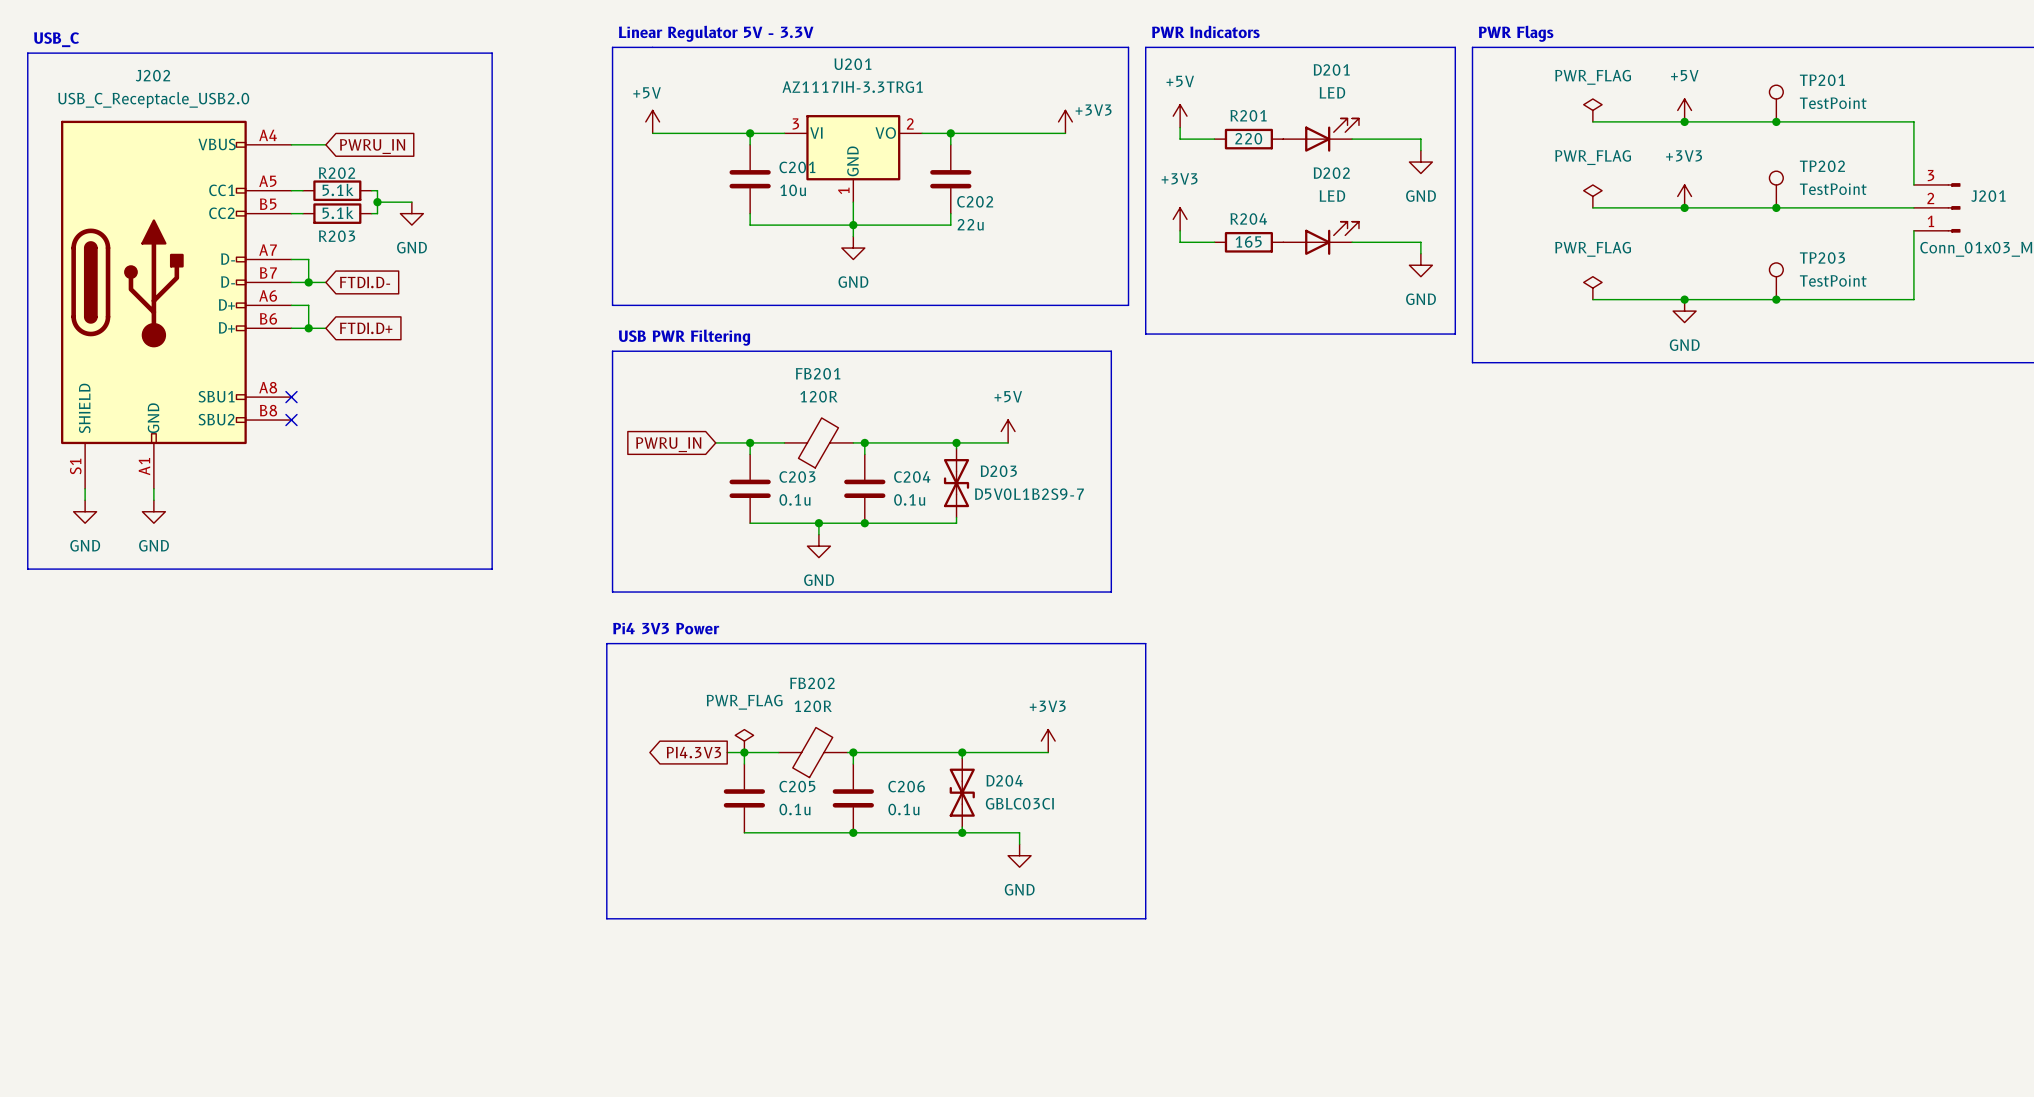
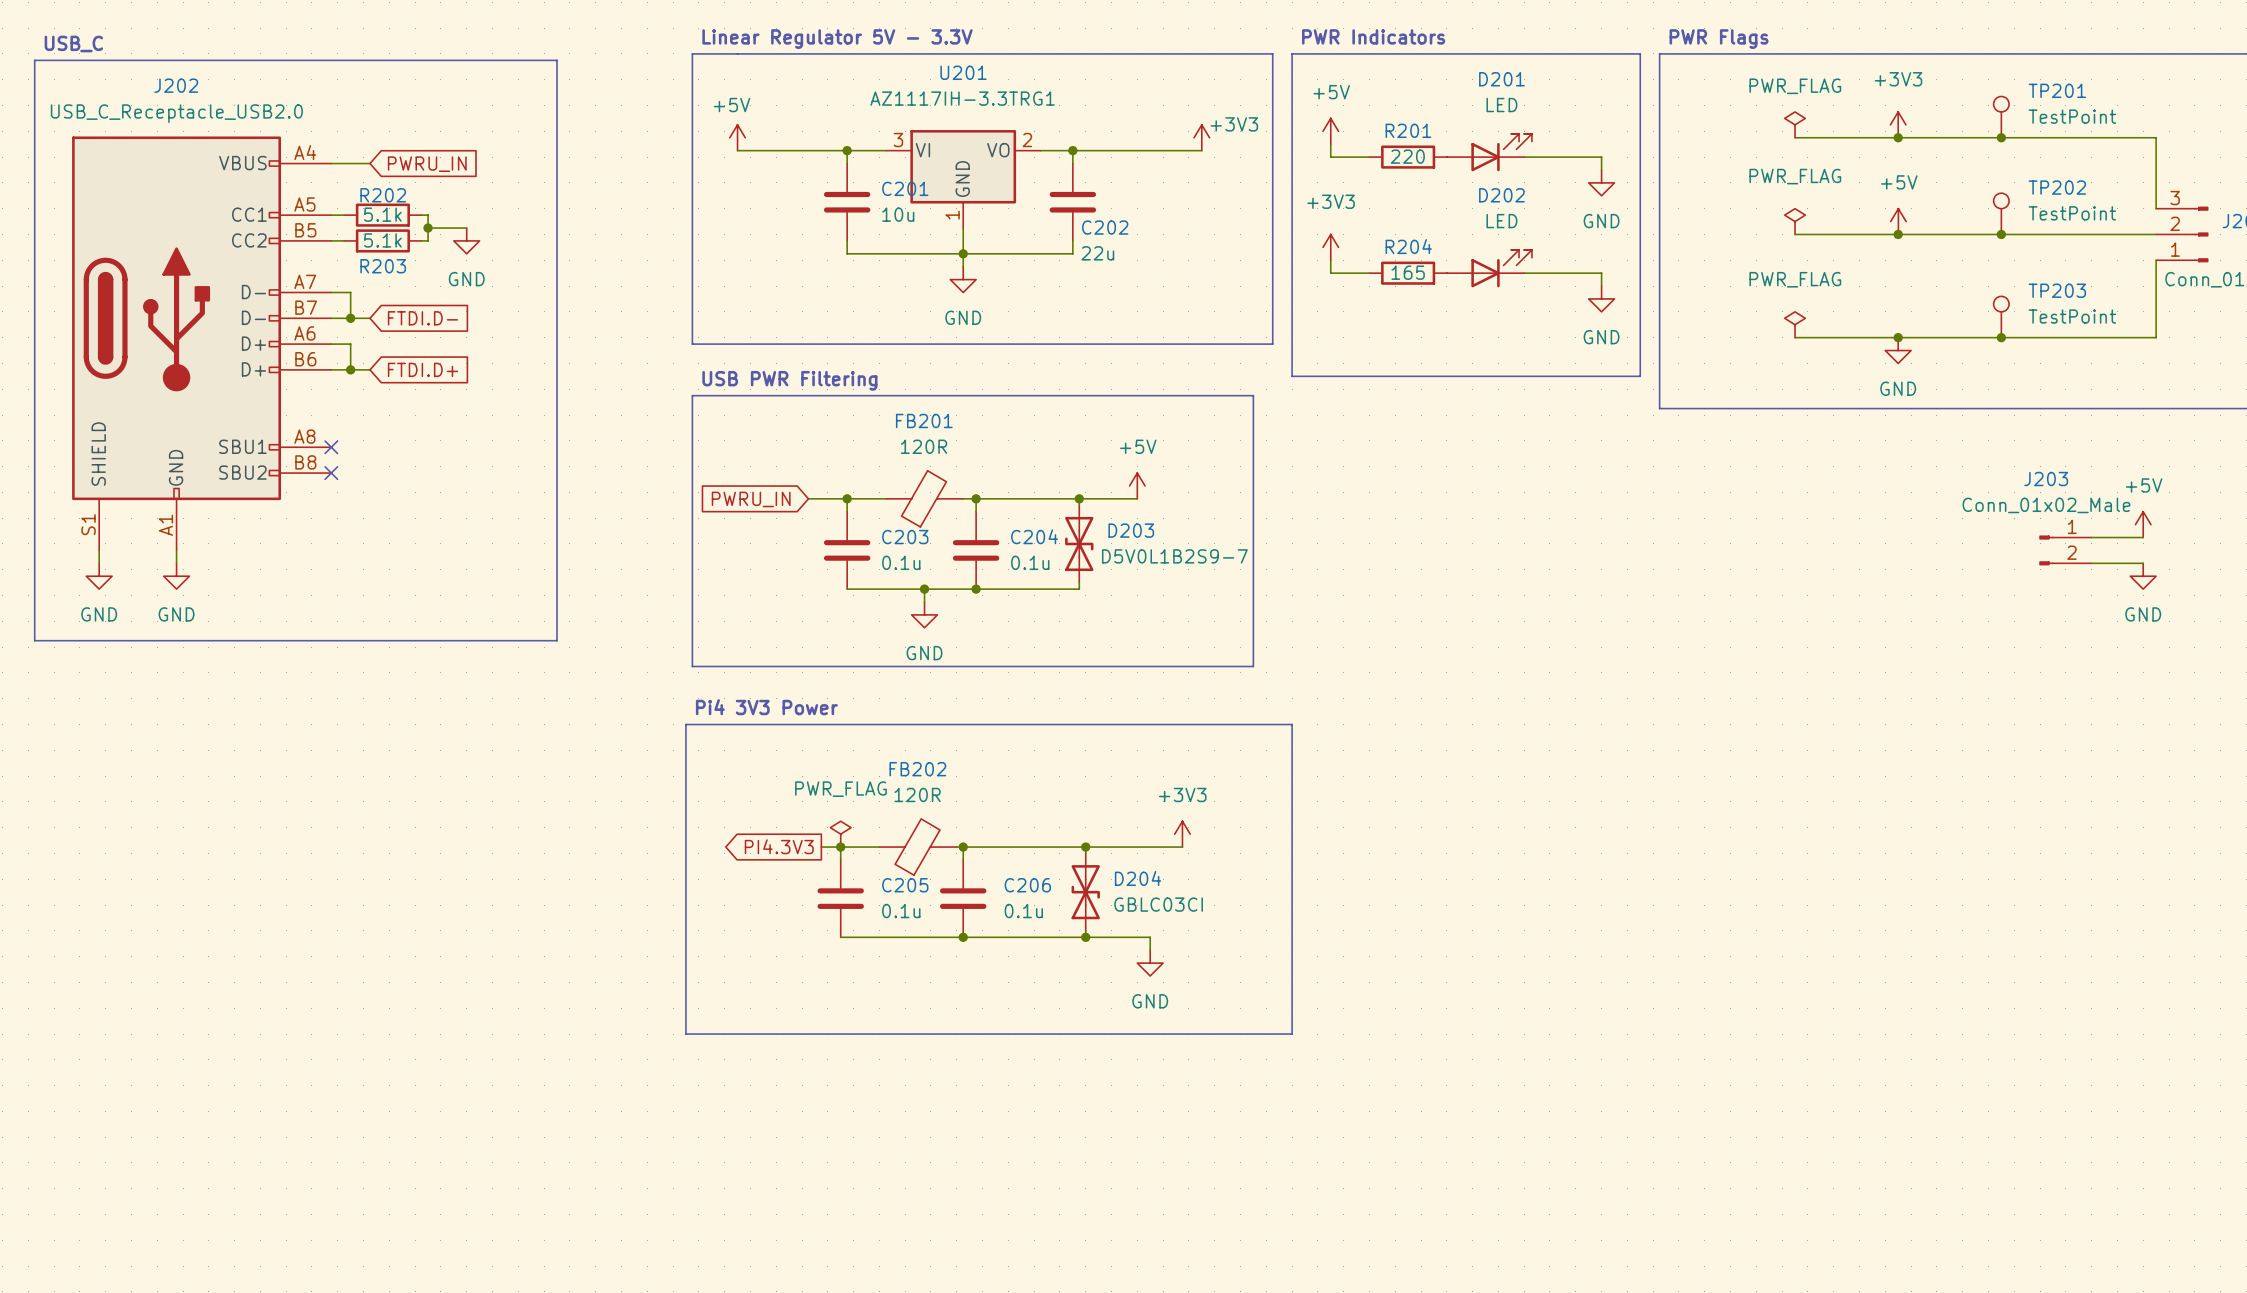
power symbol: +5V (1684, 110) -> +3V3 (1898, 124)
power symbol: +3V3 (1684, 196) -> +5V (1898, 221)
power symbol: none -> +5V (2143, 524)
wire: none -> (2091, 537) (2143, 537)
J203: none -> Conn_01x02_Male (2065, 550)
wire: none -> (2091, 563) (2143, 563)
power symbol: none -> GND (2143, 576)

